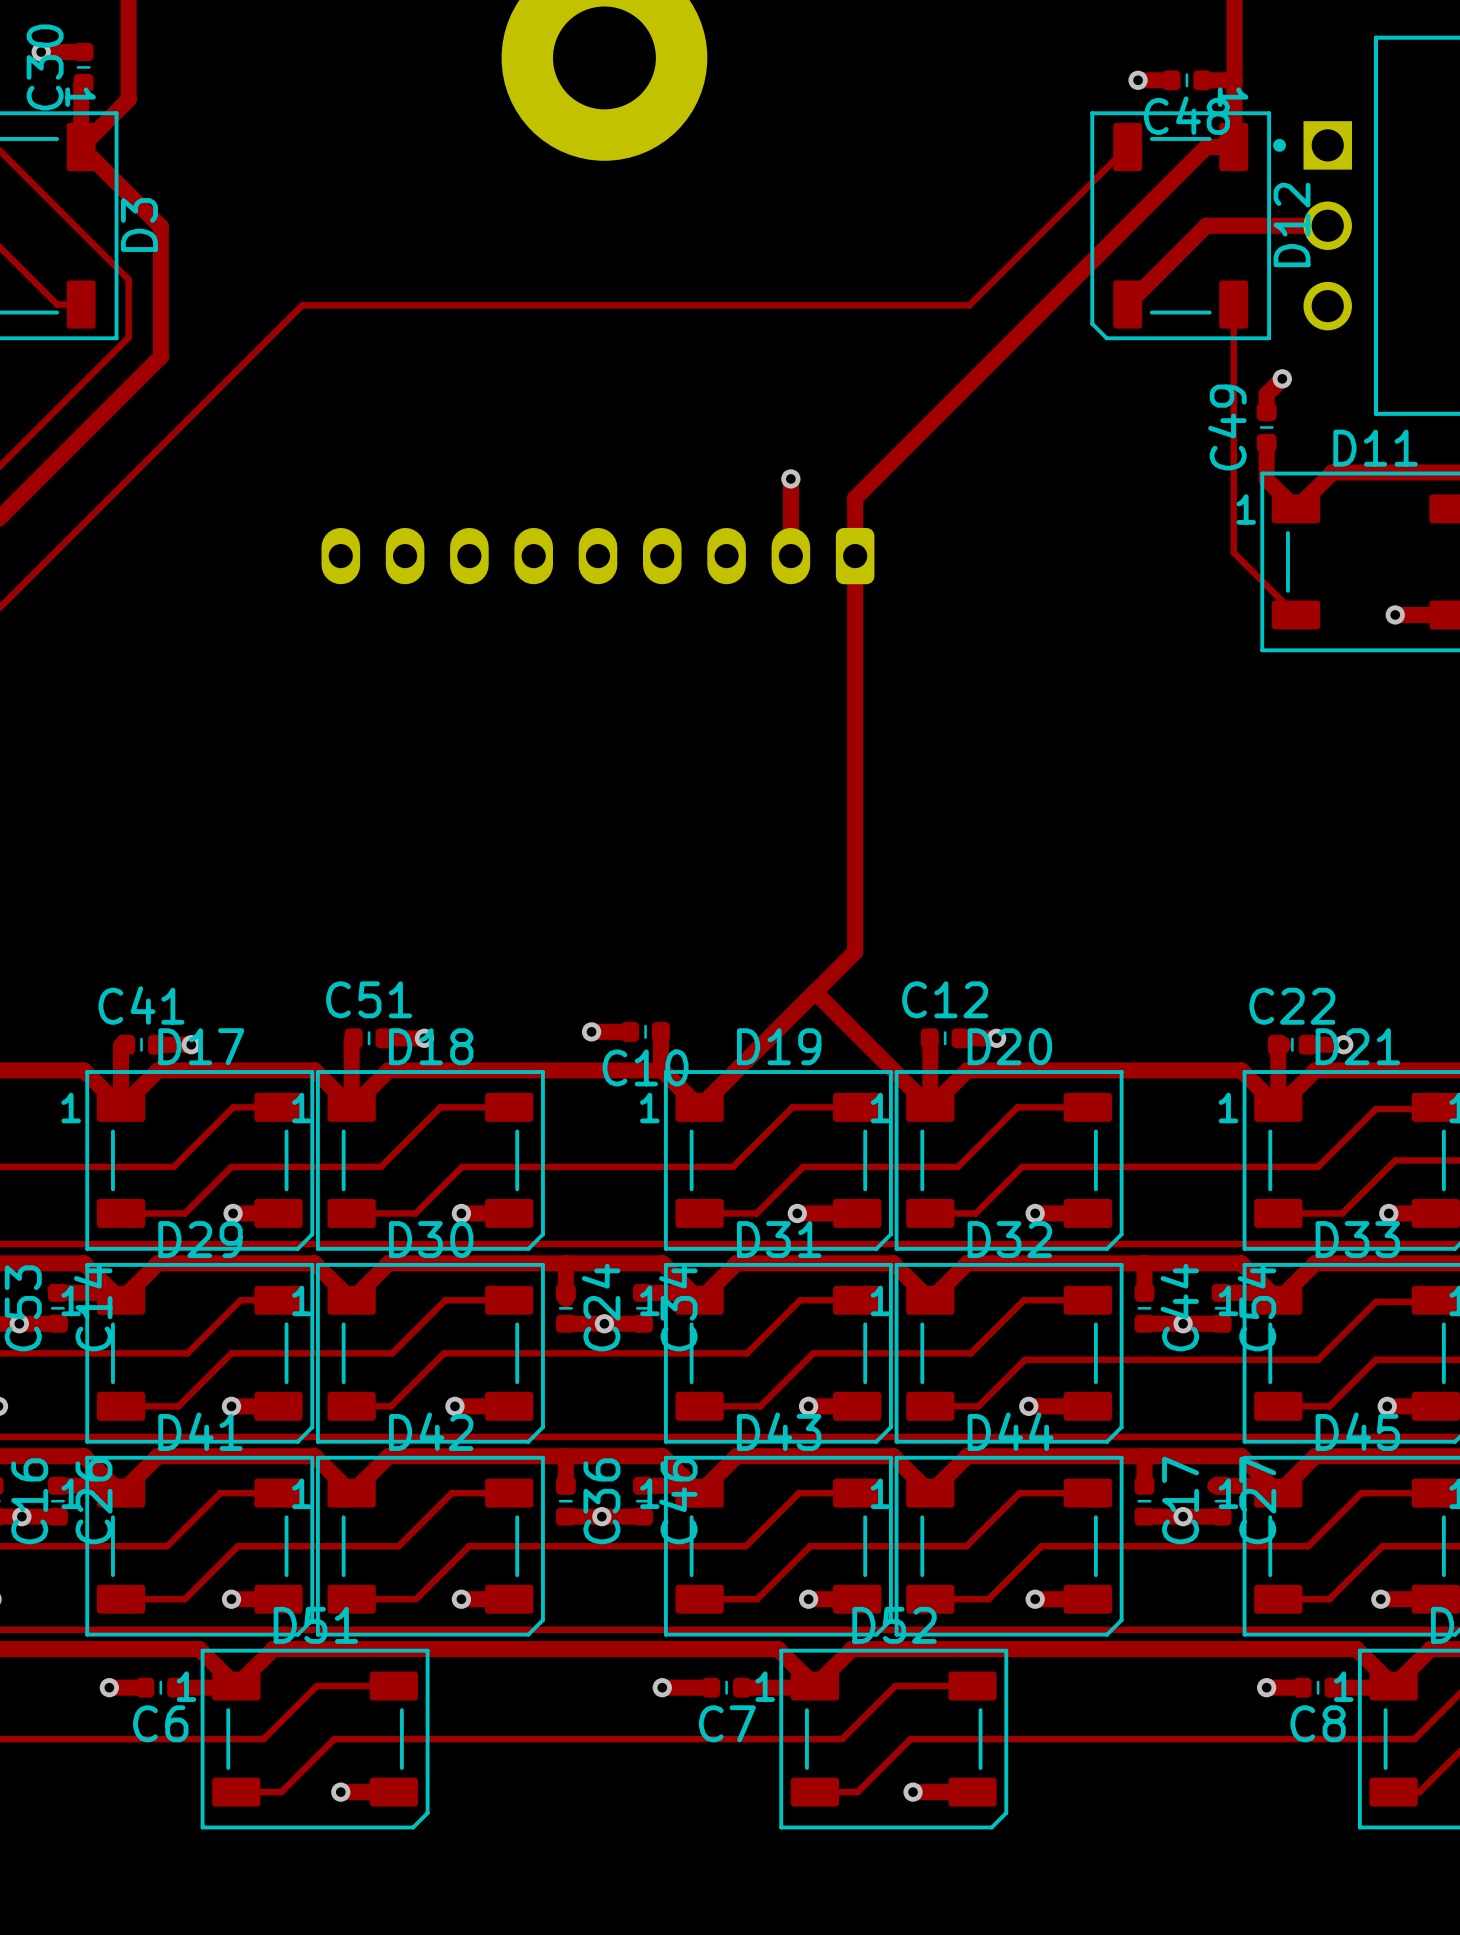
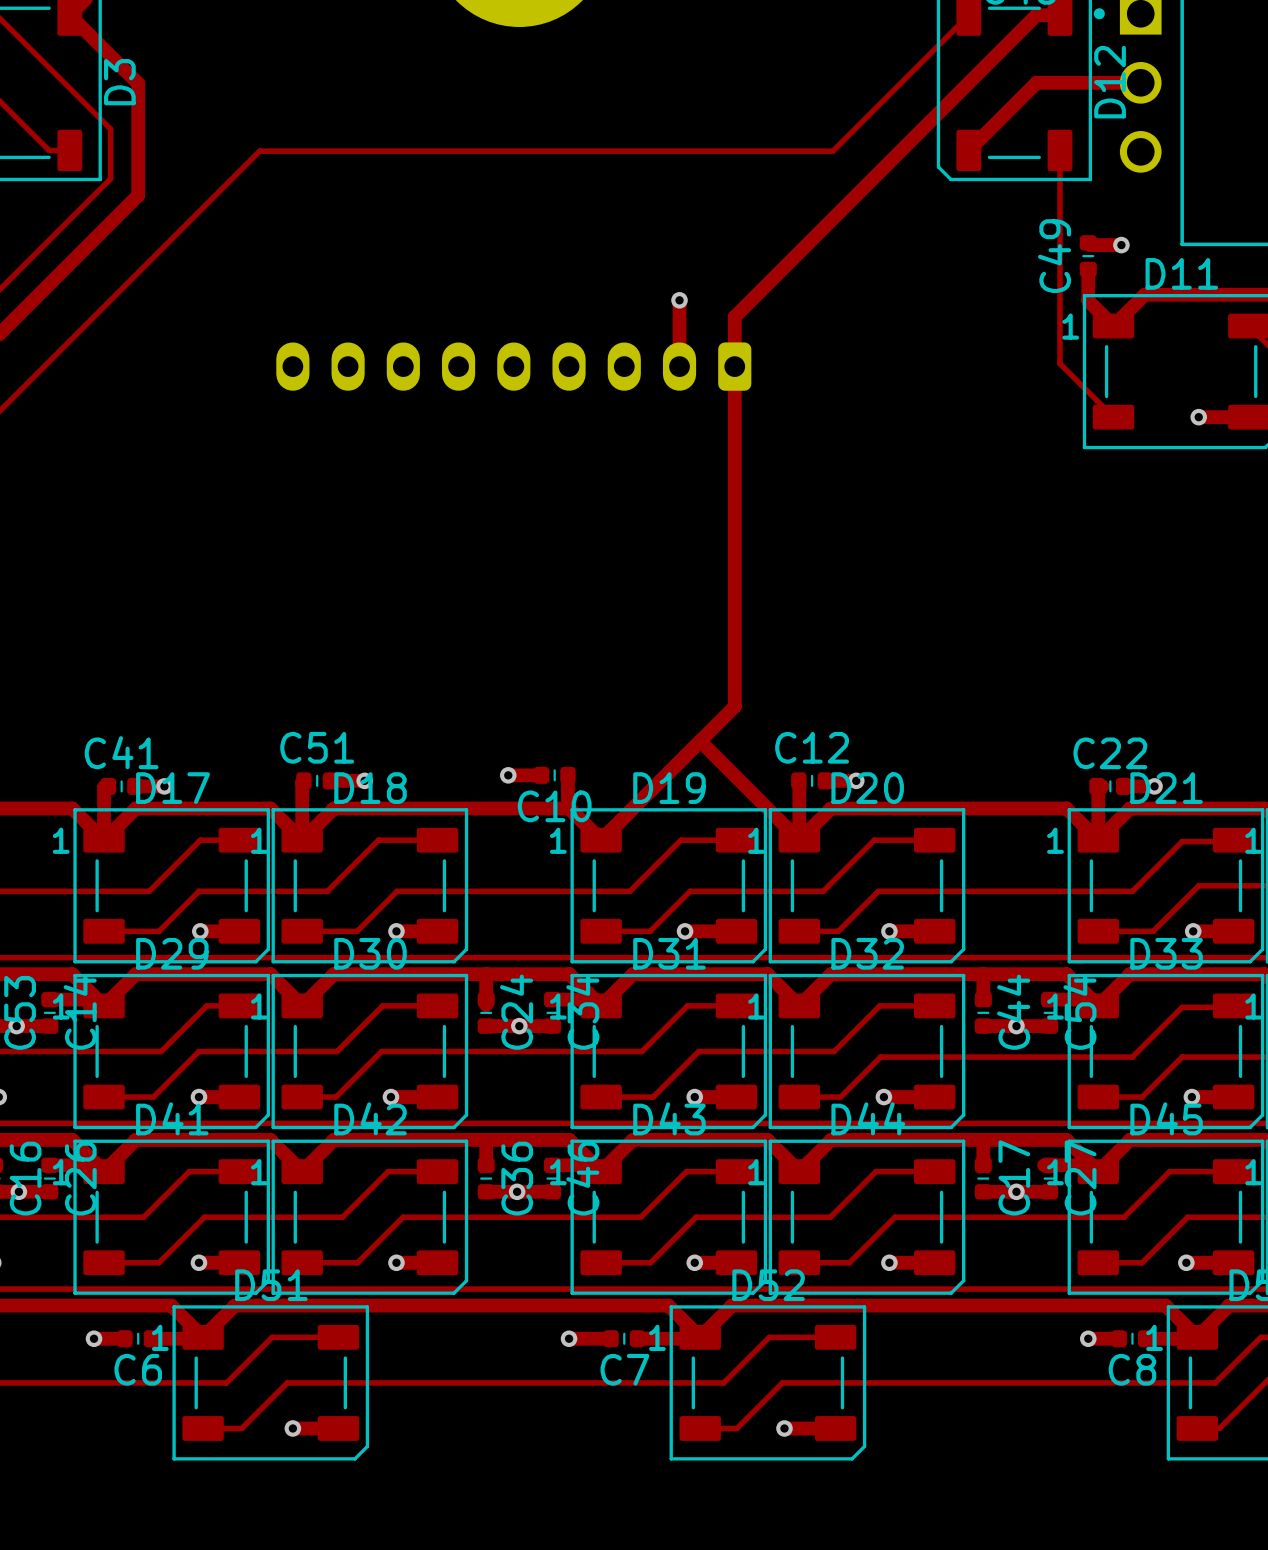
track: (1282, 378) (1266, 394) (1266, 412) -> (1121, 245) (1090, 245) (1088, 242)
via position: (1282, 378) -> (1121, 245)

